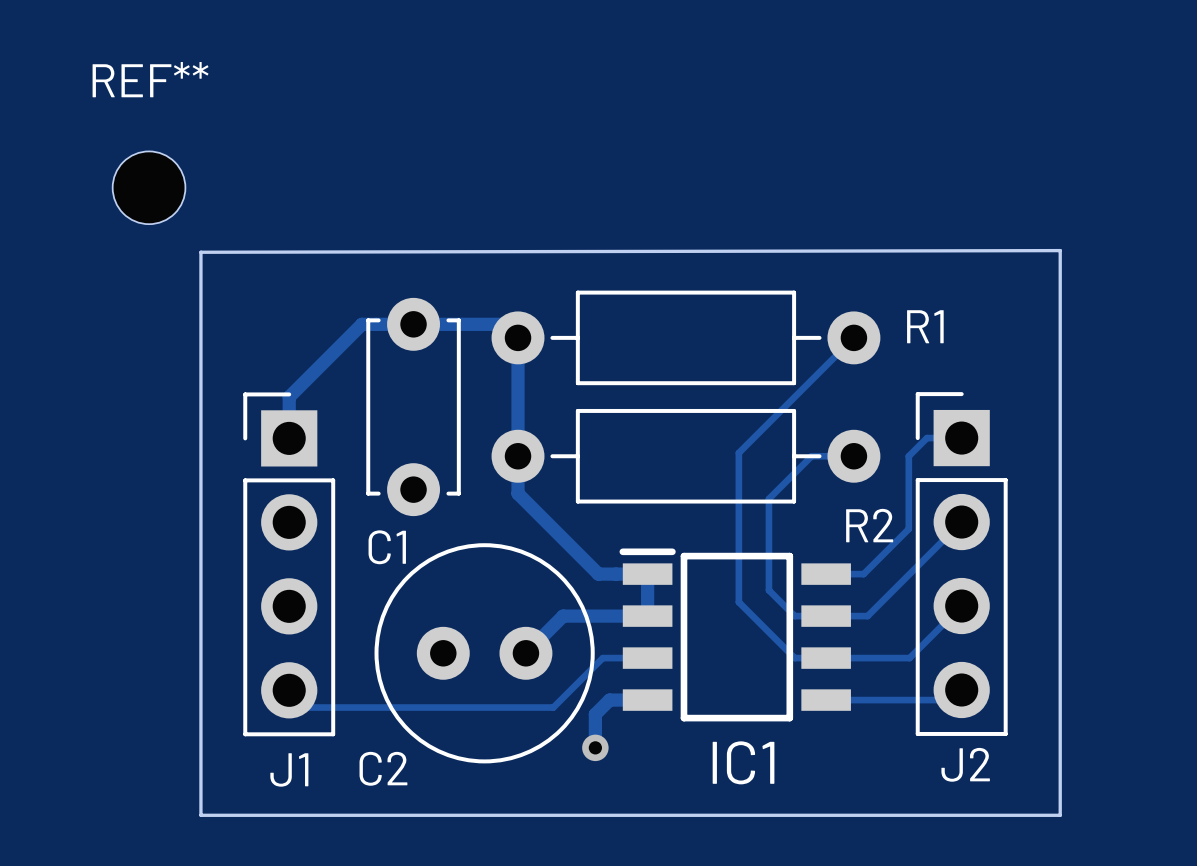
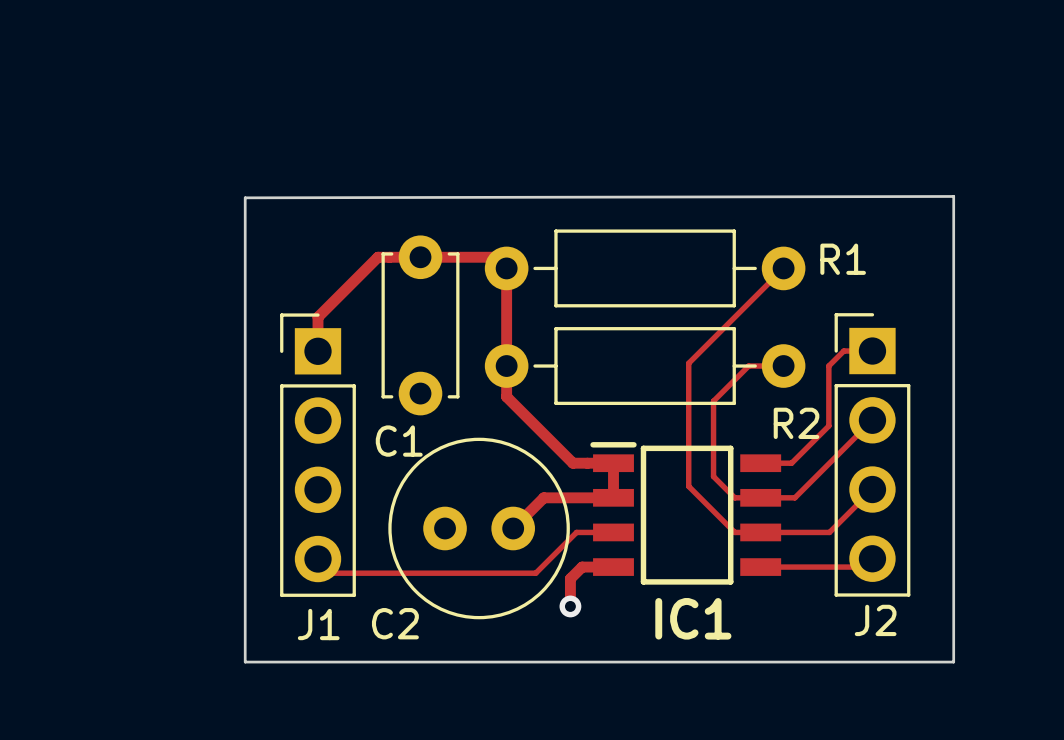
REF**: (149, 187) -> none

